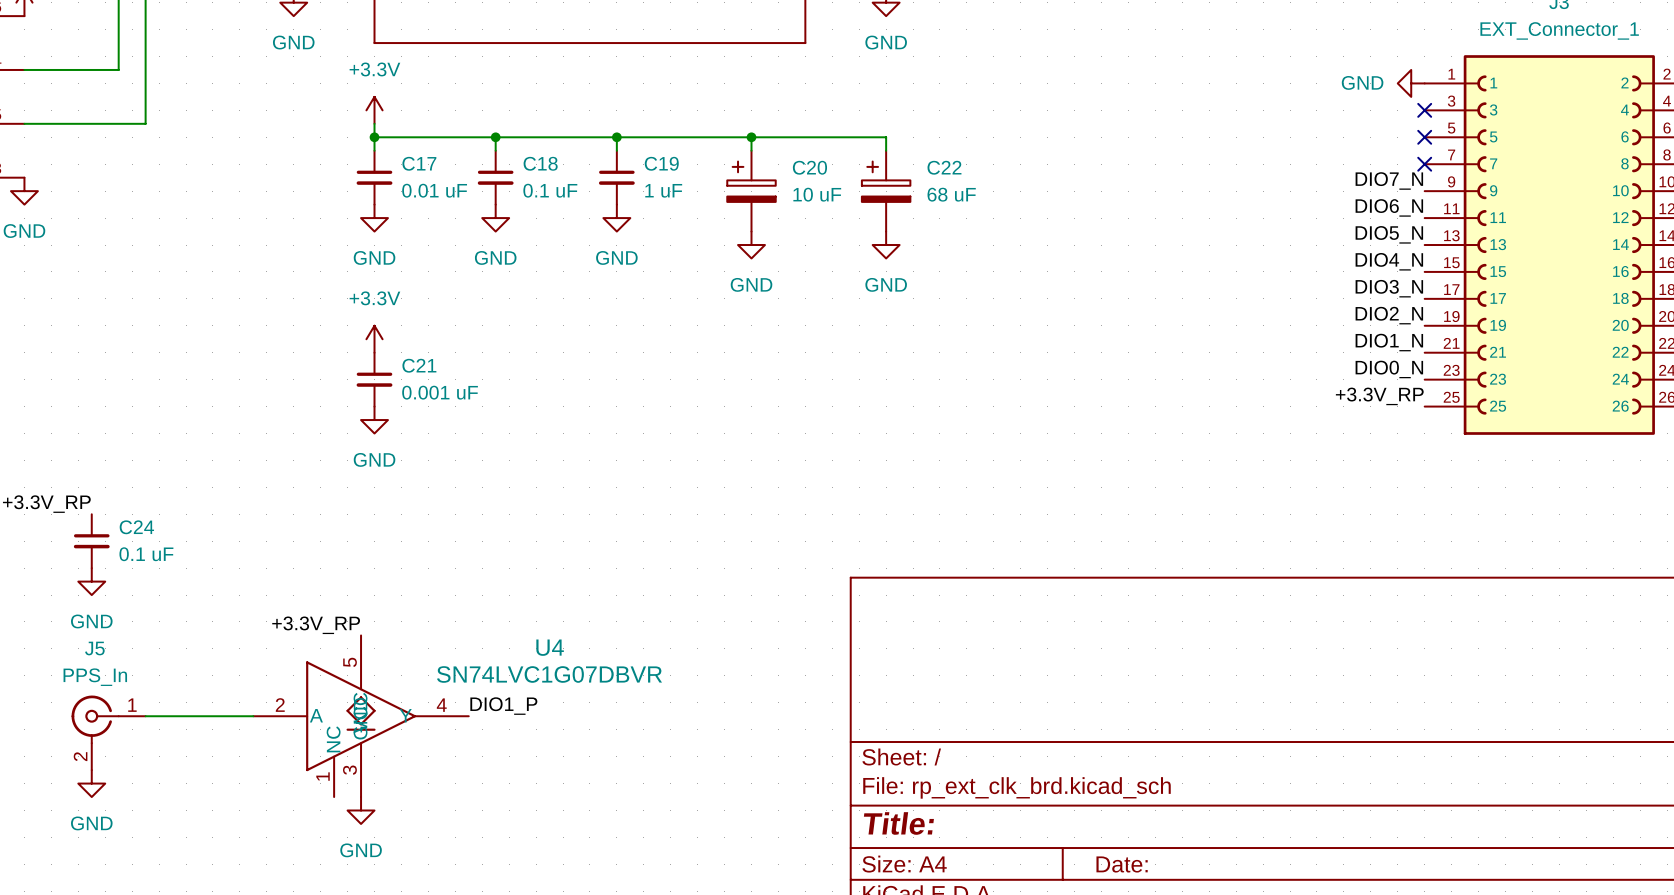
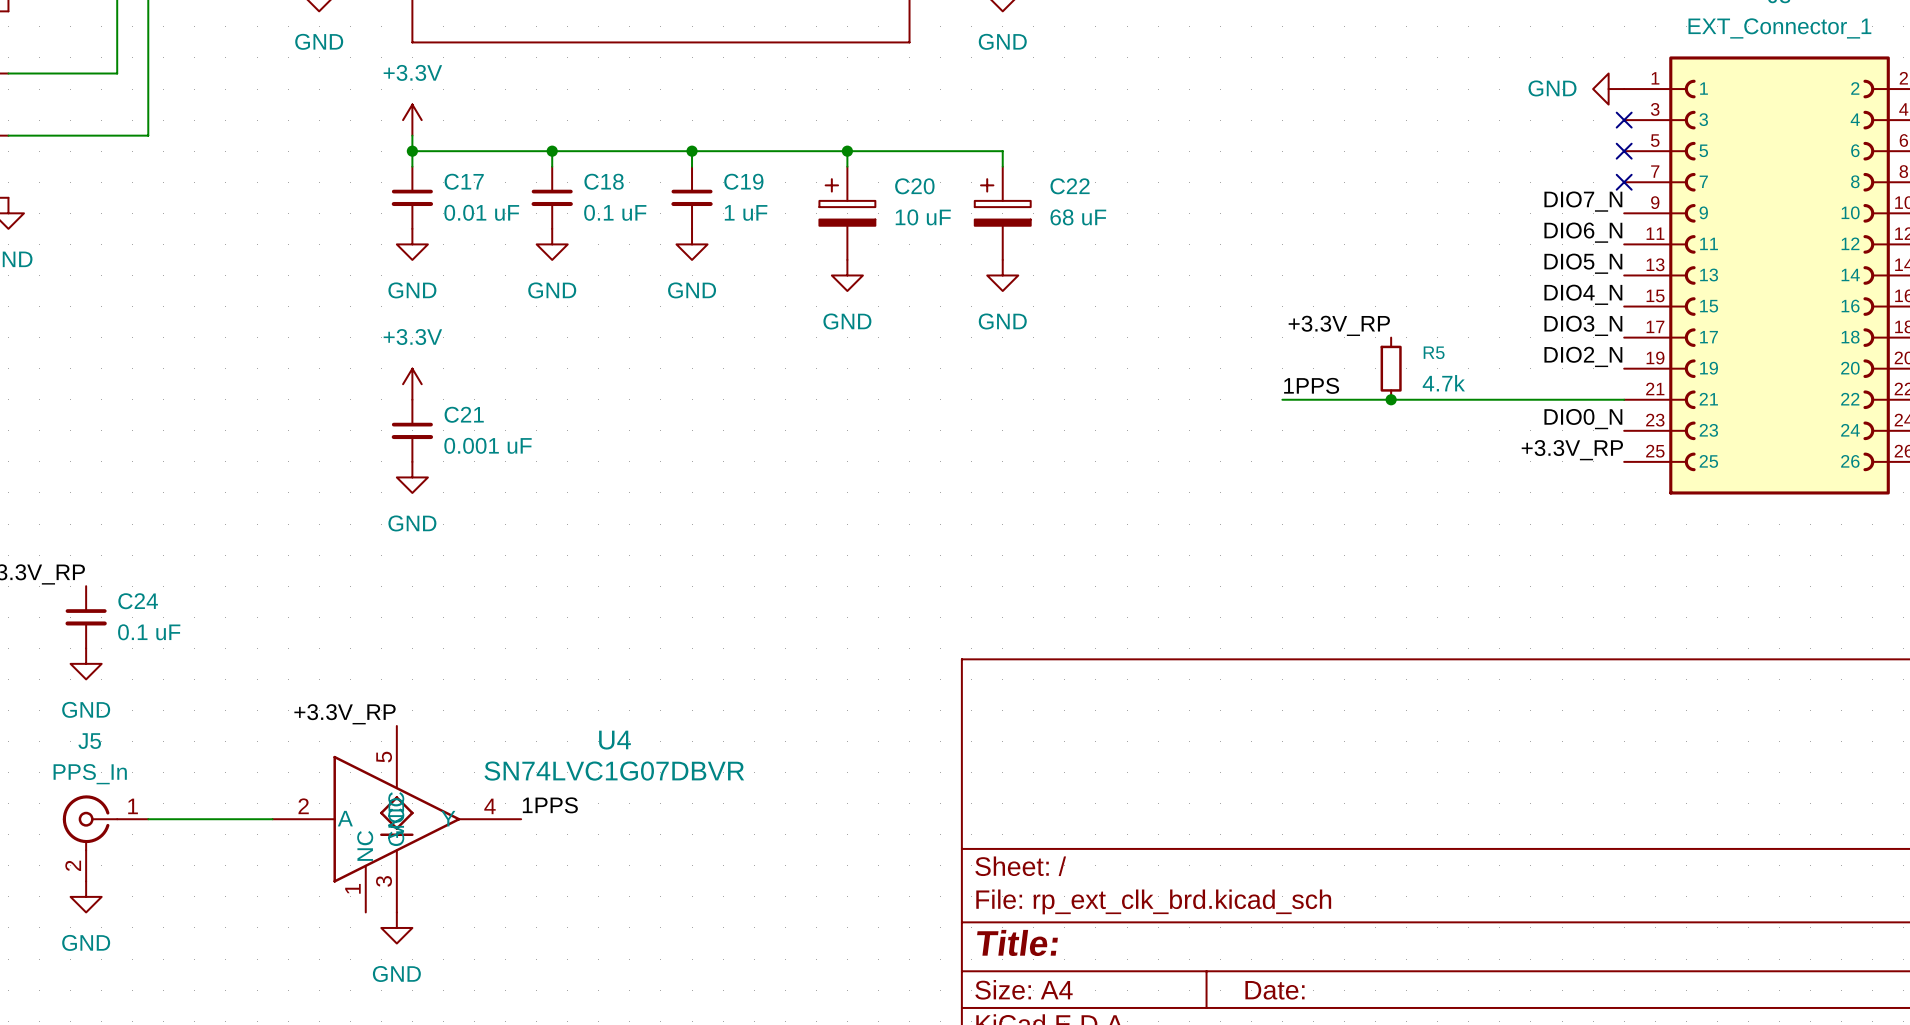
label: none -> +3.3V_RP (1339, 325)
R5: none -> 4.7k (1391, 368)
label: none -> 1PPS (1311, 385)
label: DIO1_N (1389, 342) -> none
wire: none -> (1282, 399) (1624, 399)
junction: none -> (1391, 399)
label: DIO1_P (503, 706) -> 1PPS (550, 805)

